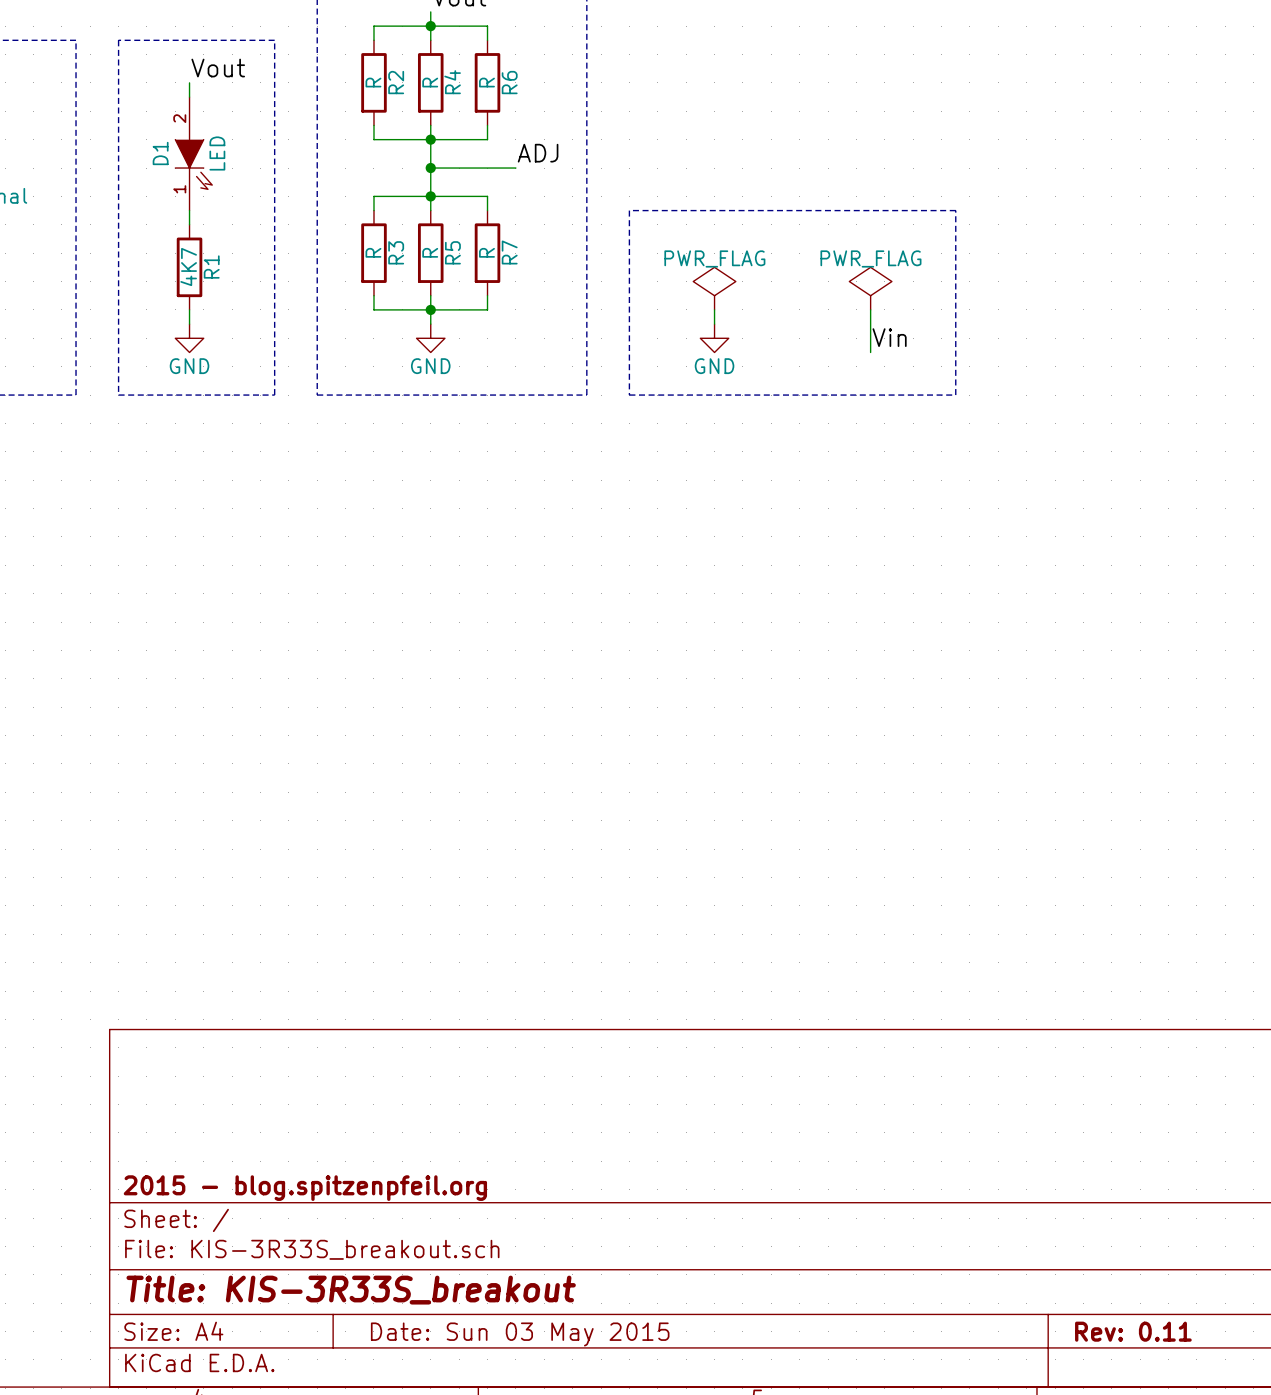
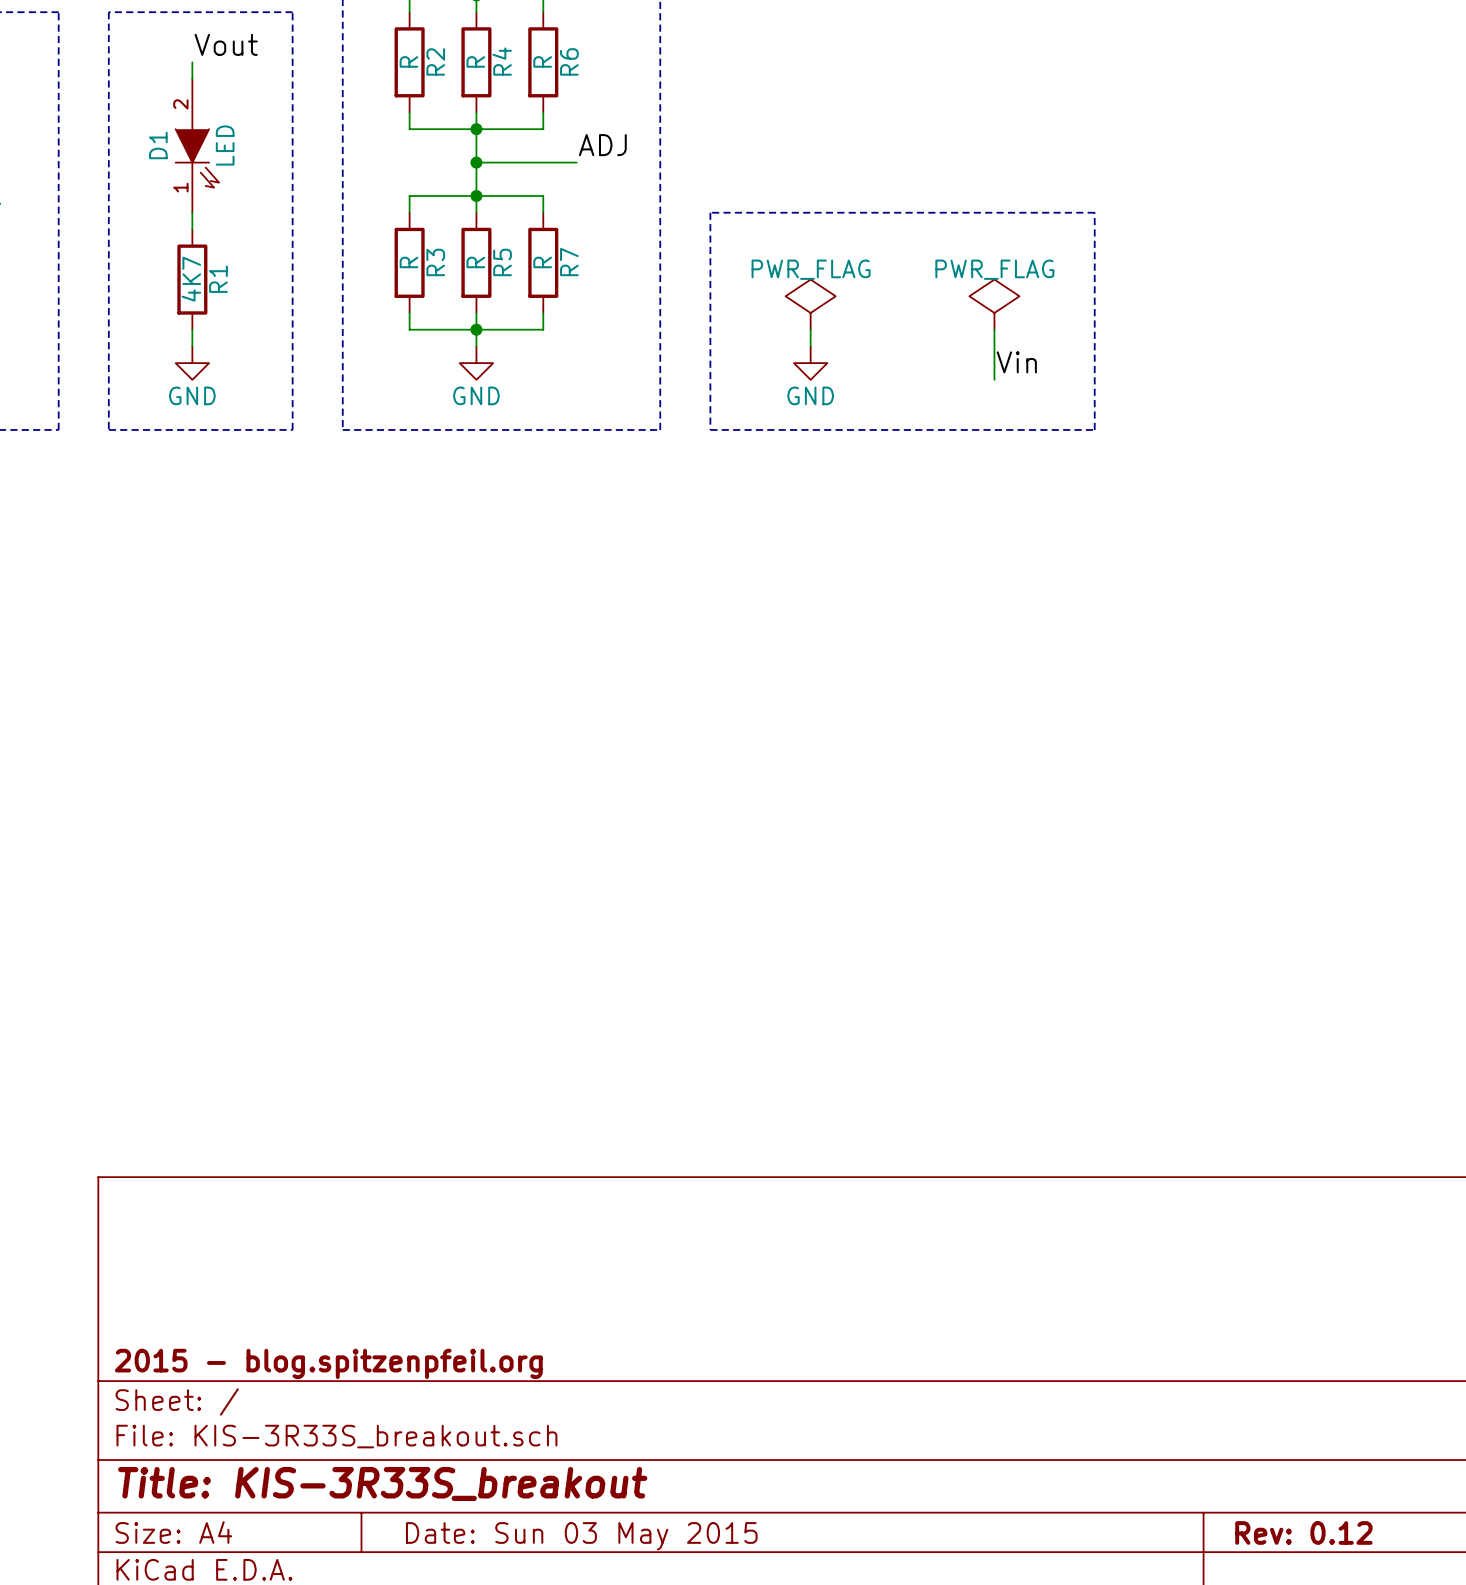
title block: Rev: 0.11 (1133, 1331) -> Rev: 0.12 (1303, 1532)

